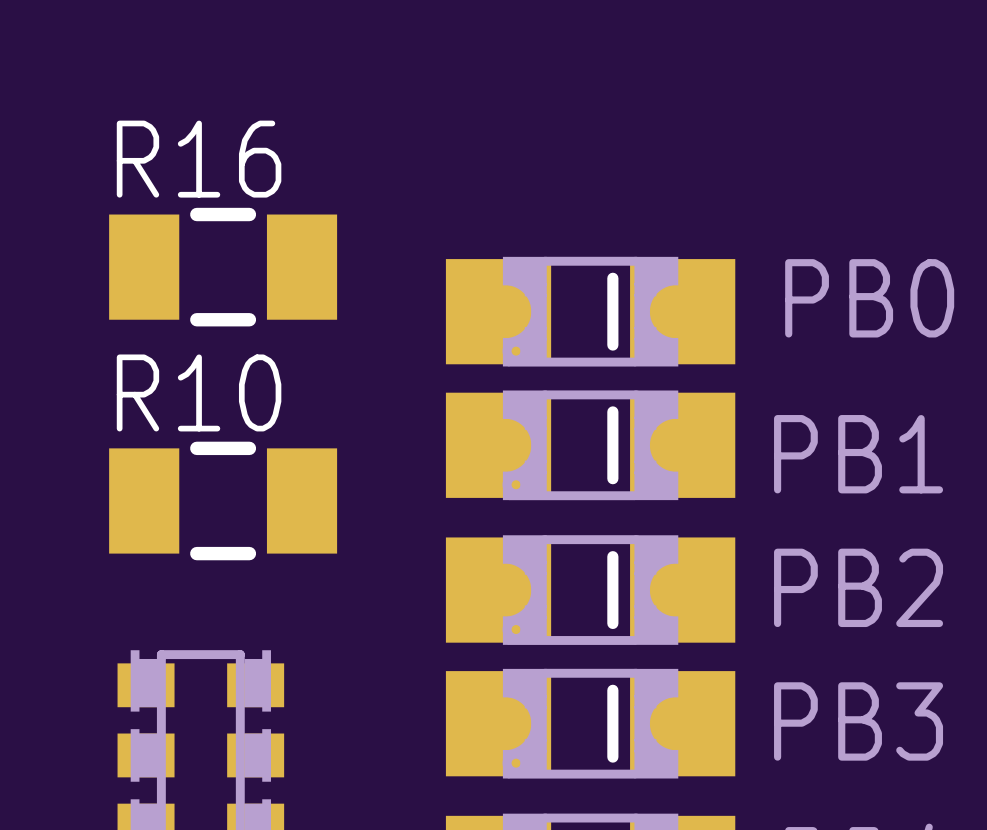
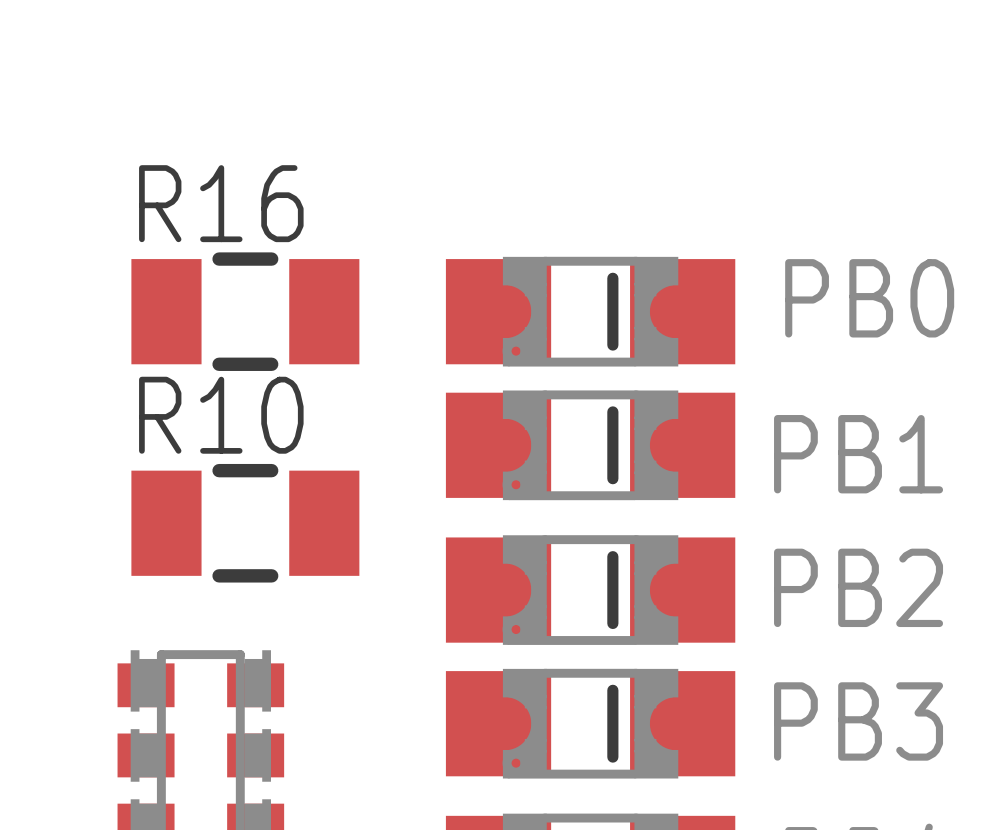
R16 position: (223, 267) -> (245, 311)
R10 position: (223, 500) -> (245, 523)

